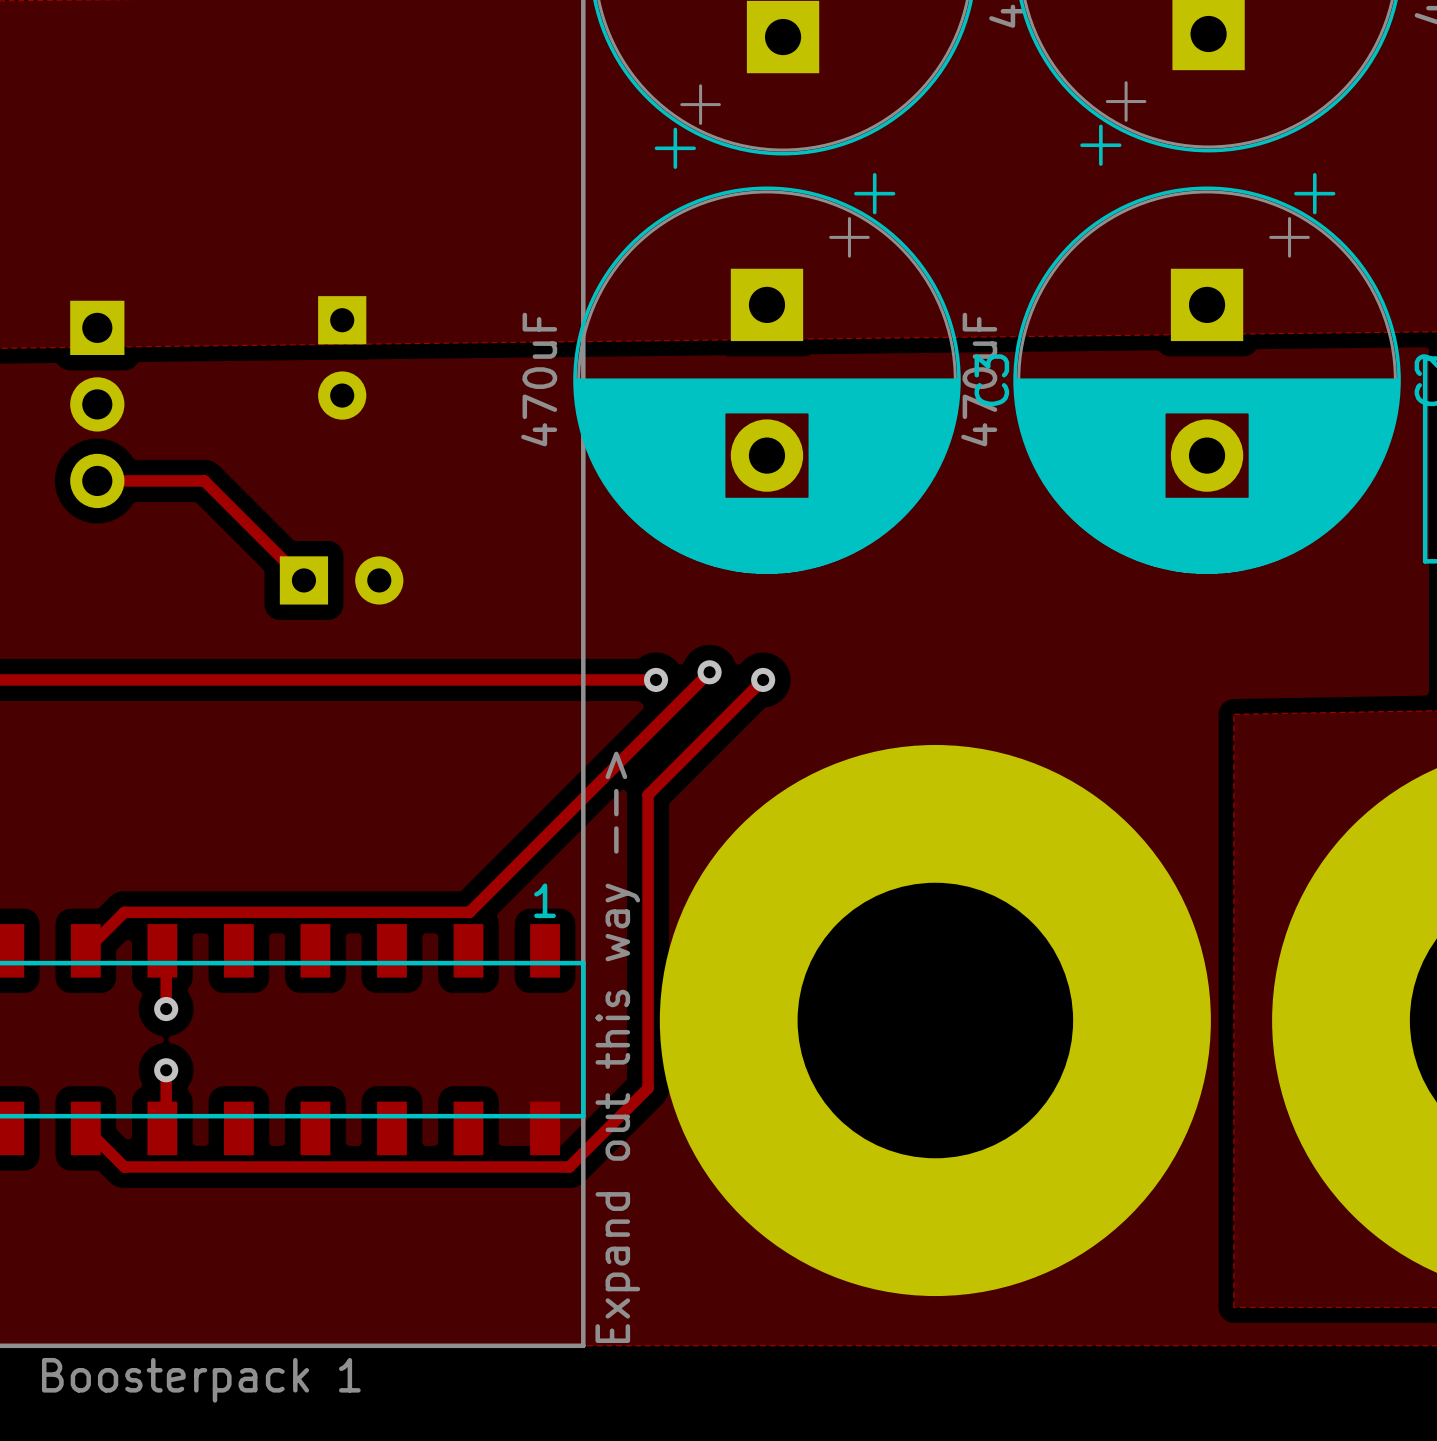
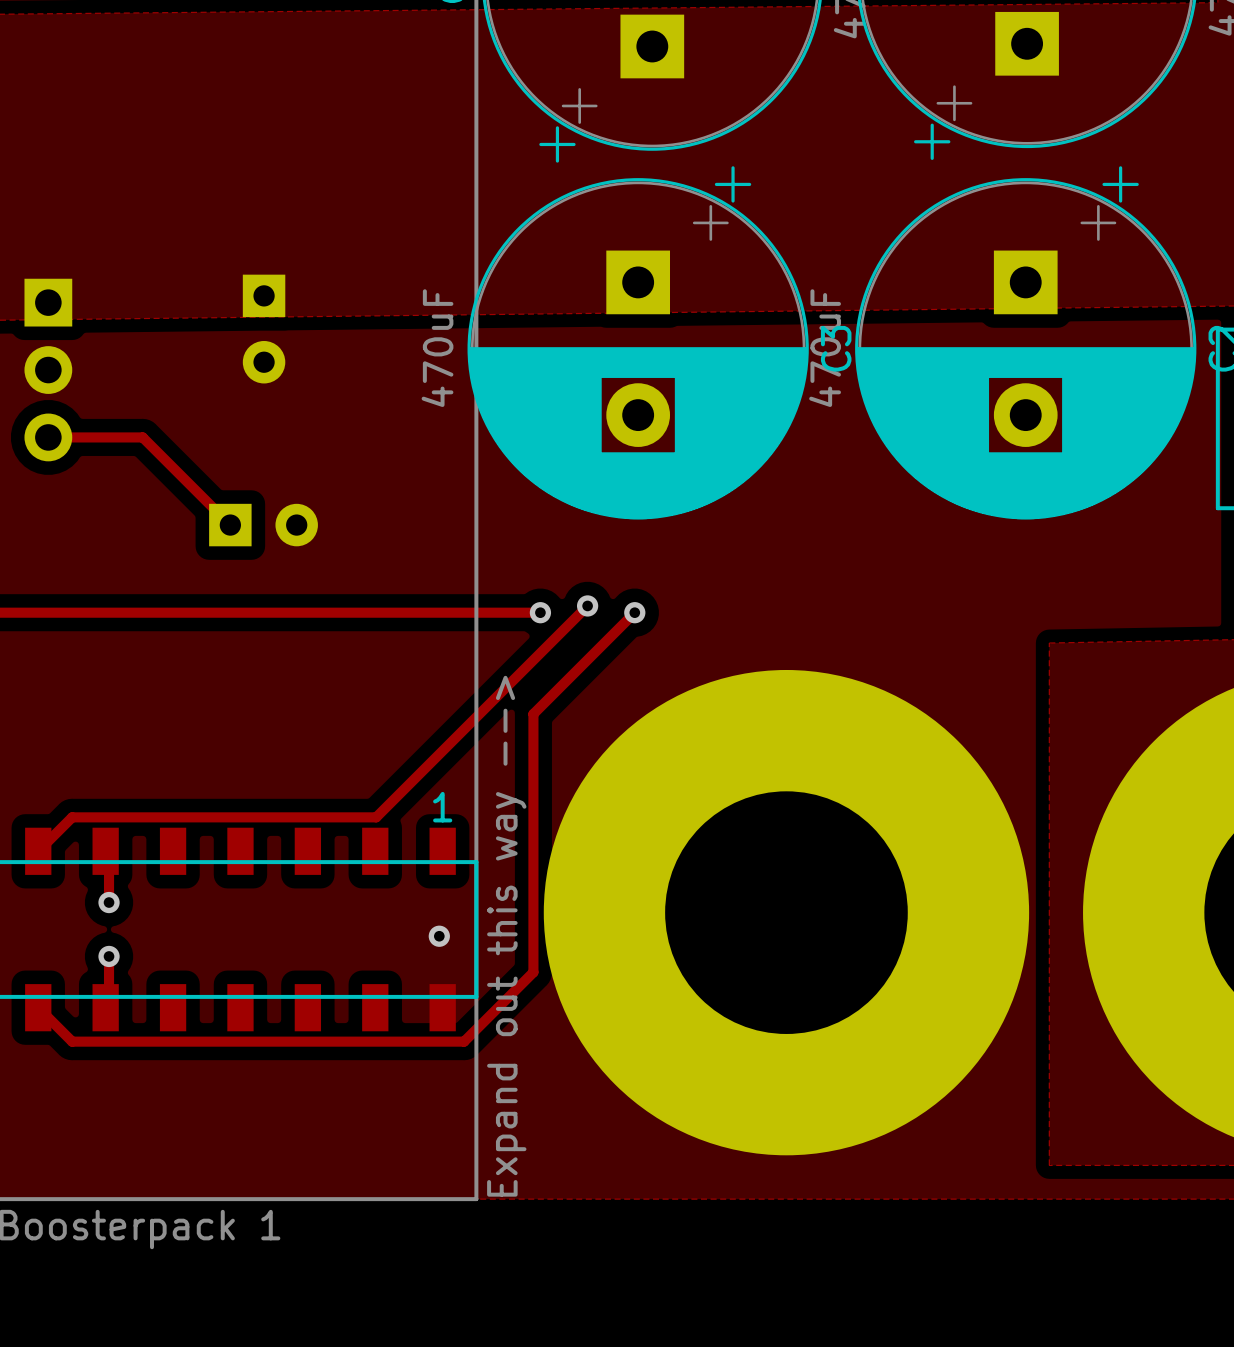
via: none -> (439, 936)

